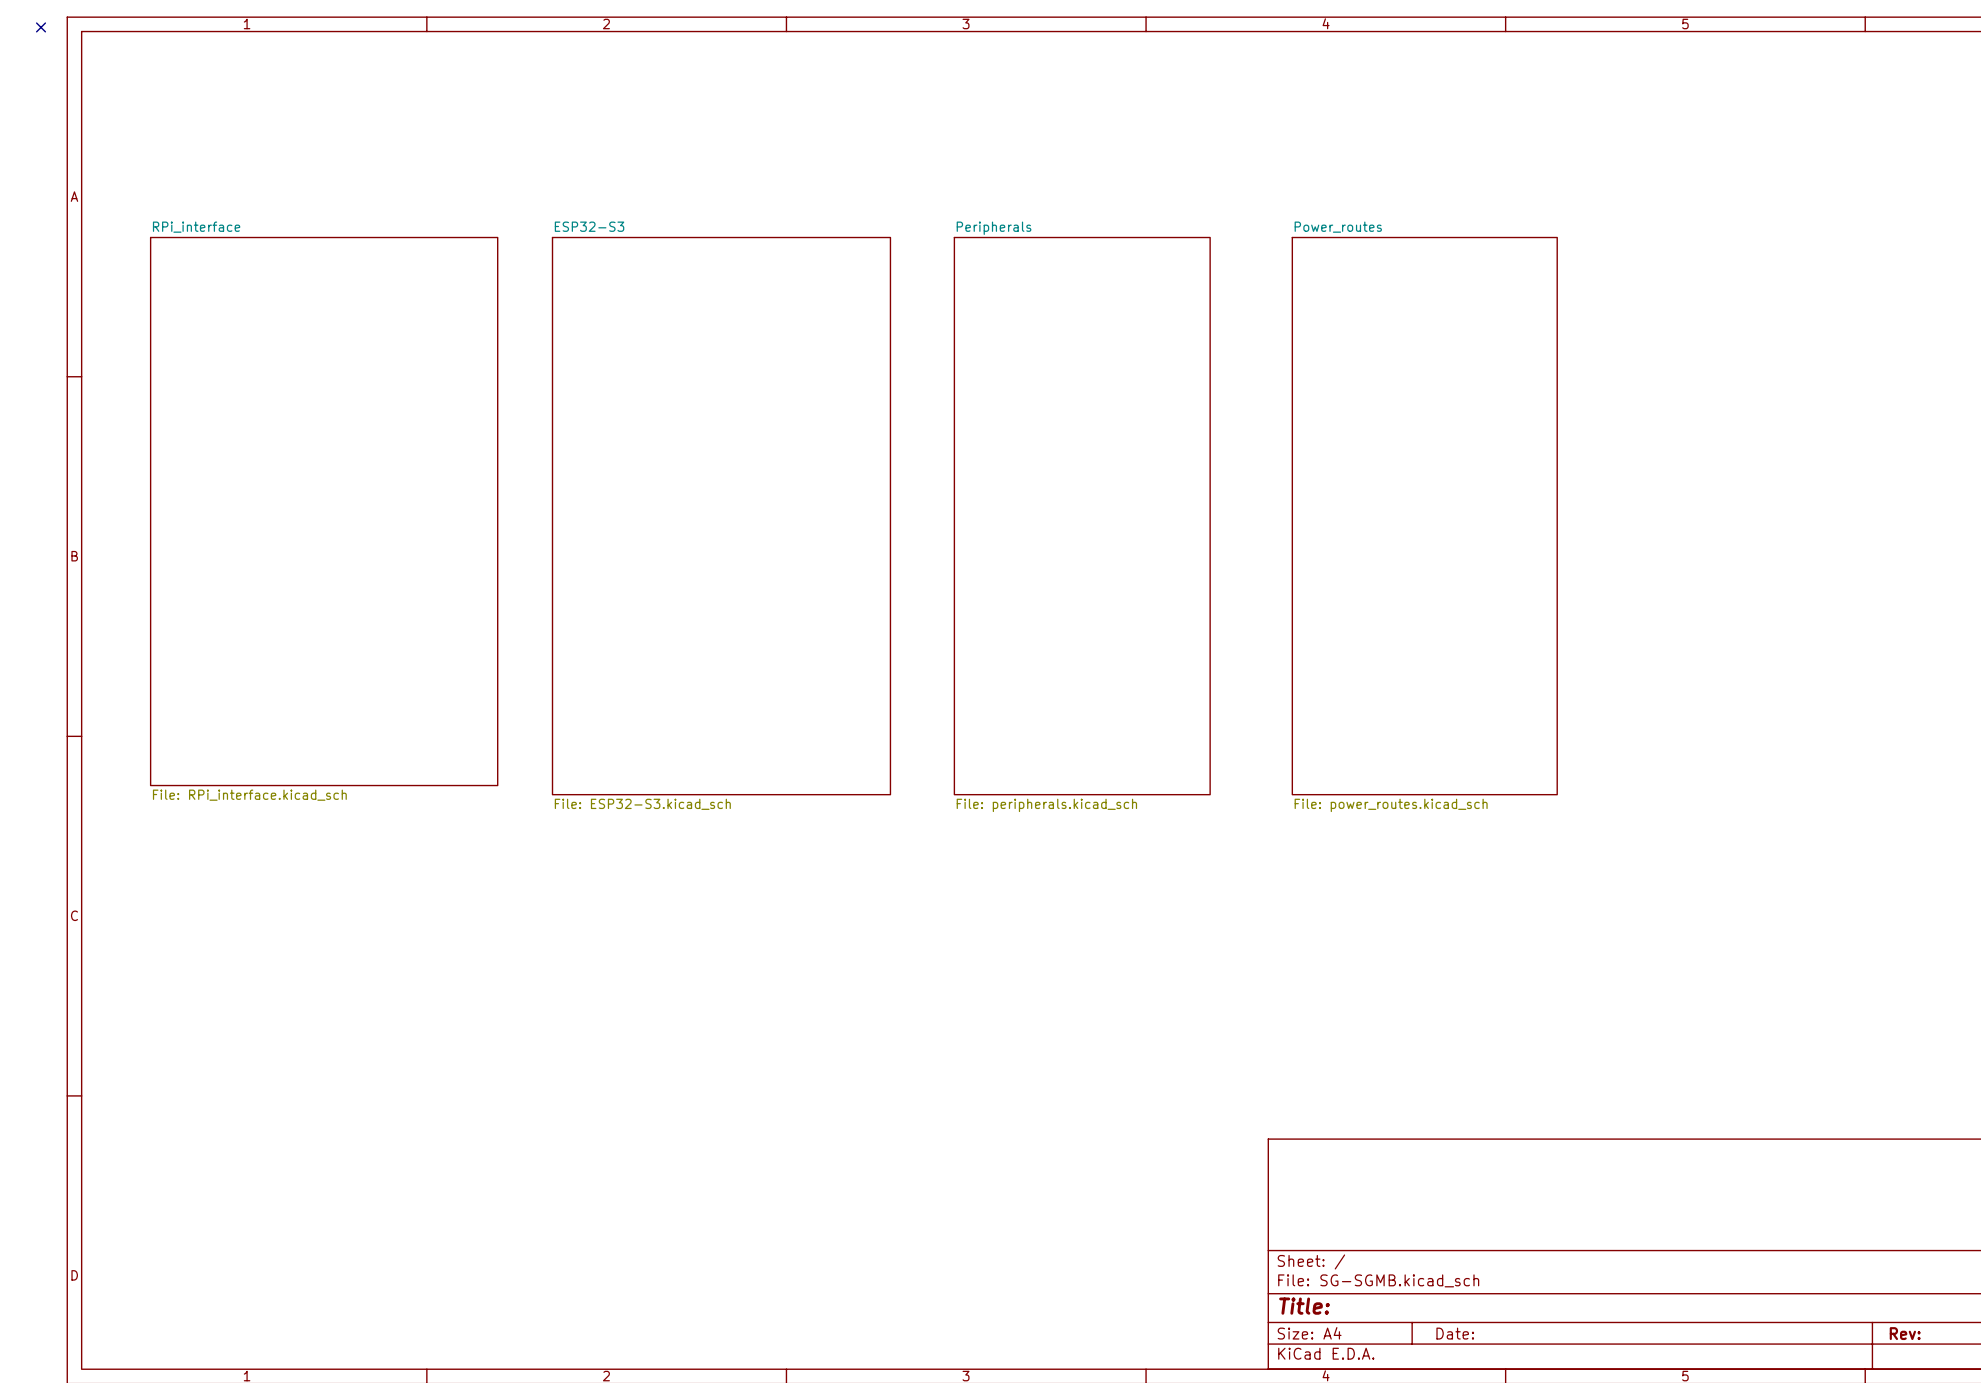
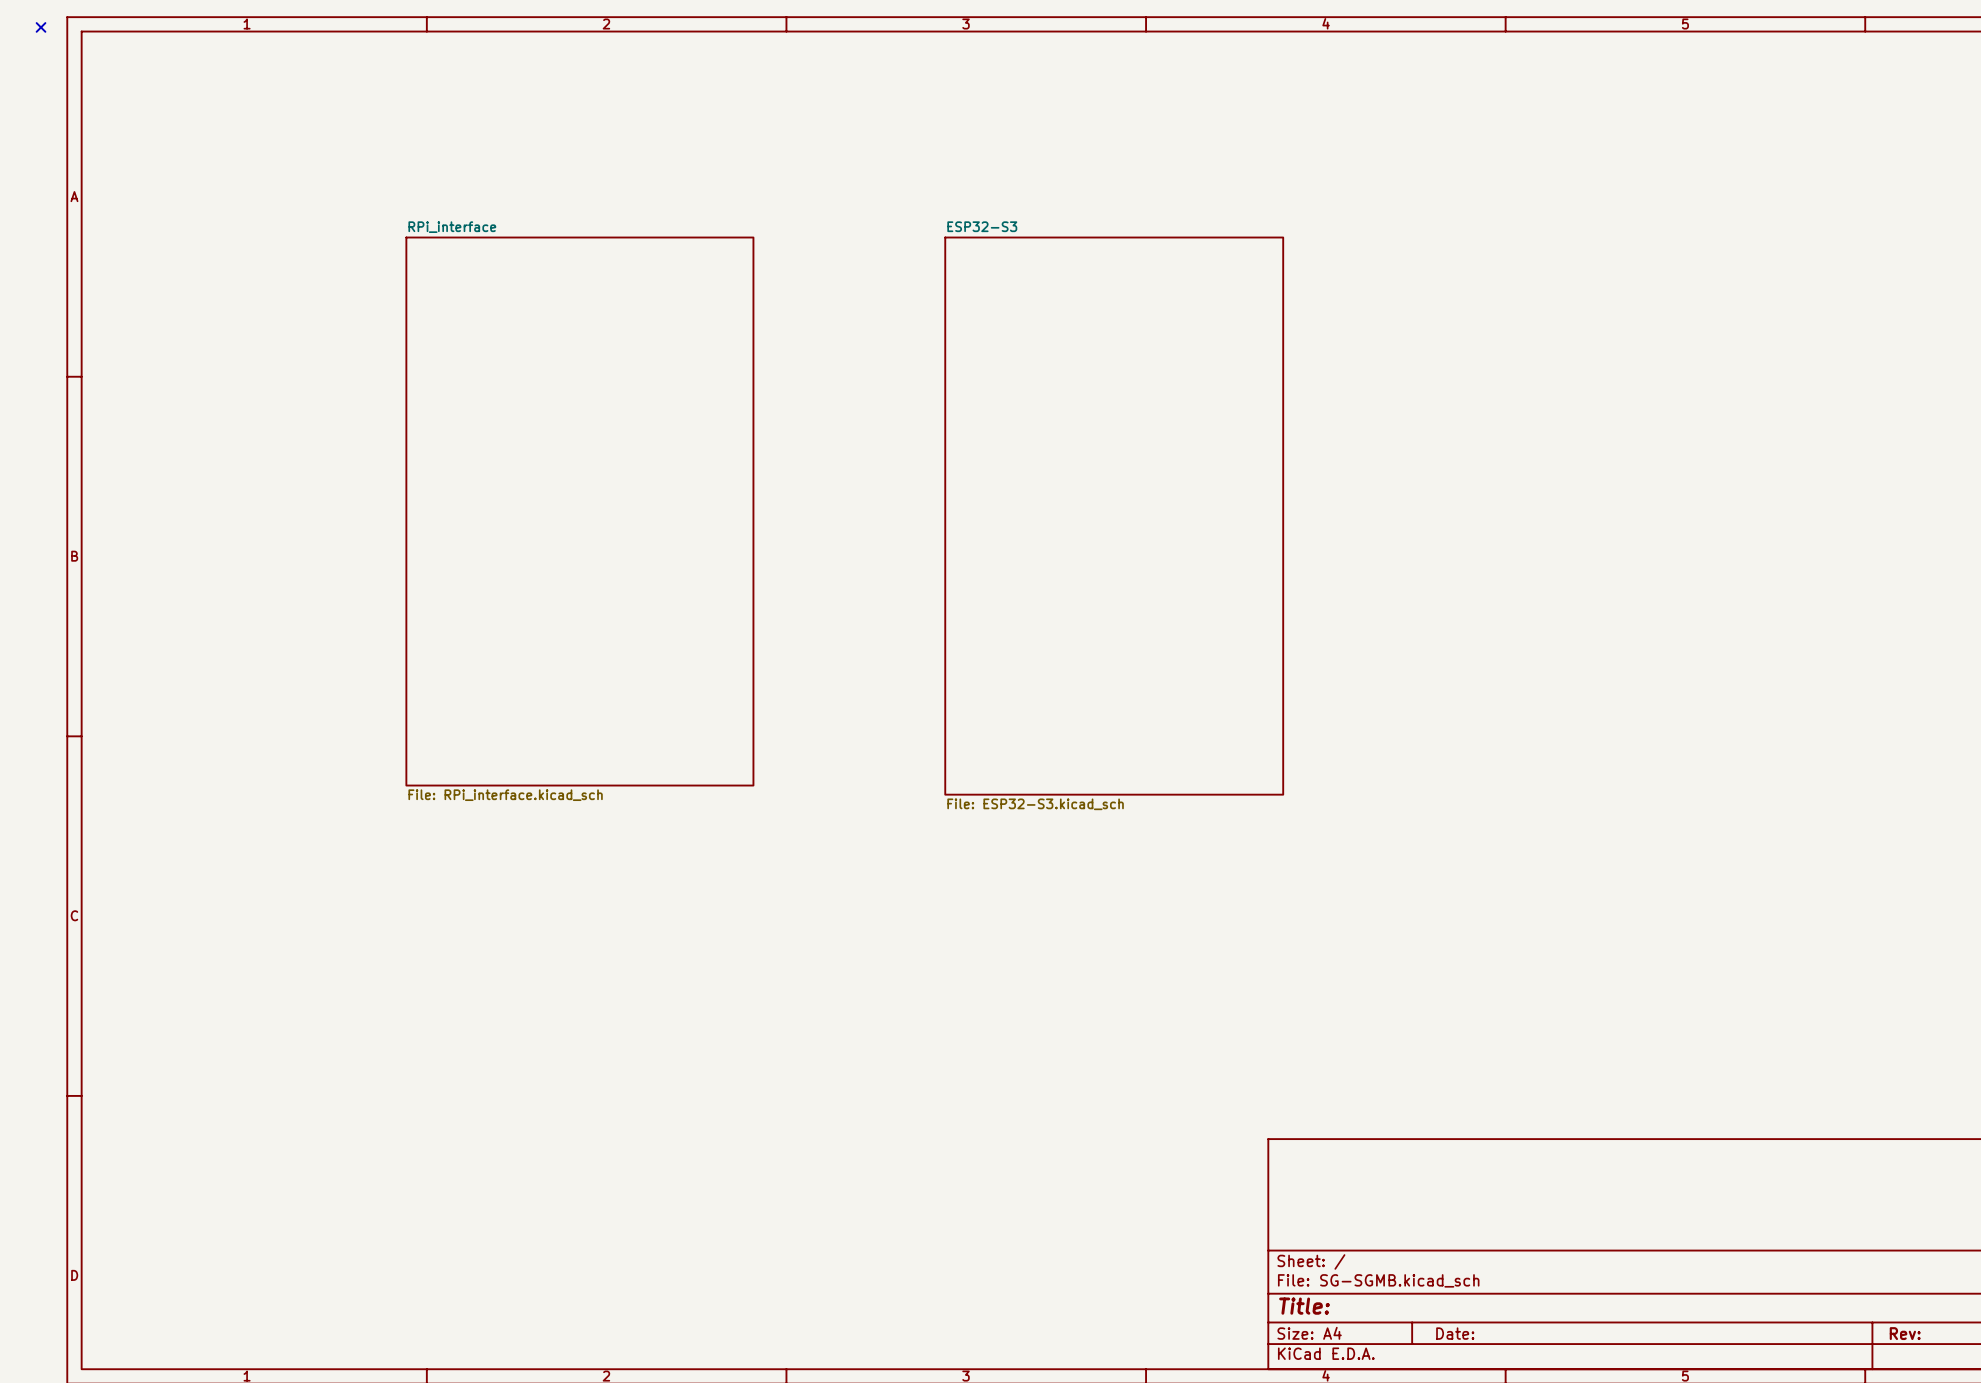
sheet RPi_interface: File: RPi_interface.kicad_sch (324, 511) -> none
sheet RPi_interface: none -> File: RPi_interface.kicad_sch (579, 511)
sheet ESP32-S3 position: (721, 516) -> (1114, 516)
sheet Peripherals: File: peripherals.kicad_sch (1082, 516) -> none
sheet Power_routes: File: power_routes.kicad_sch (1424, 516) -> none

